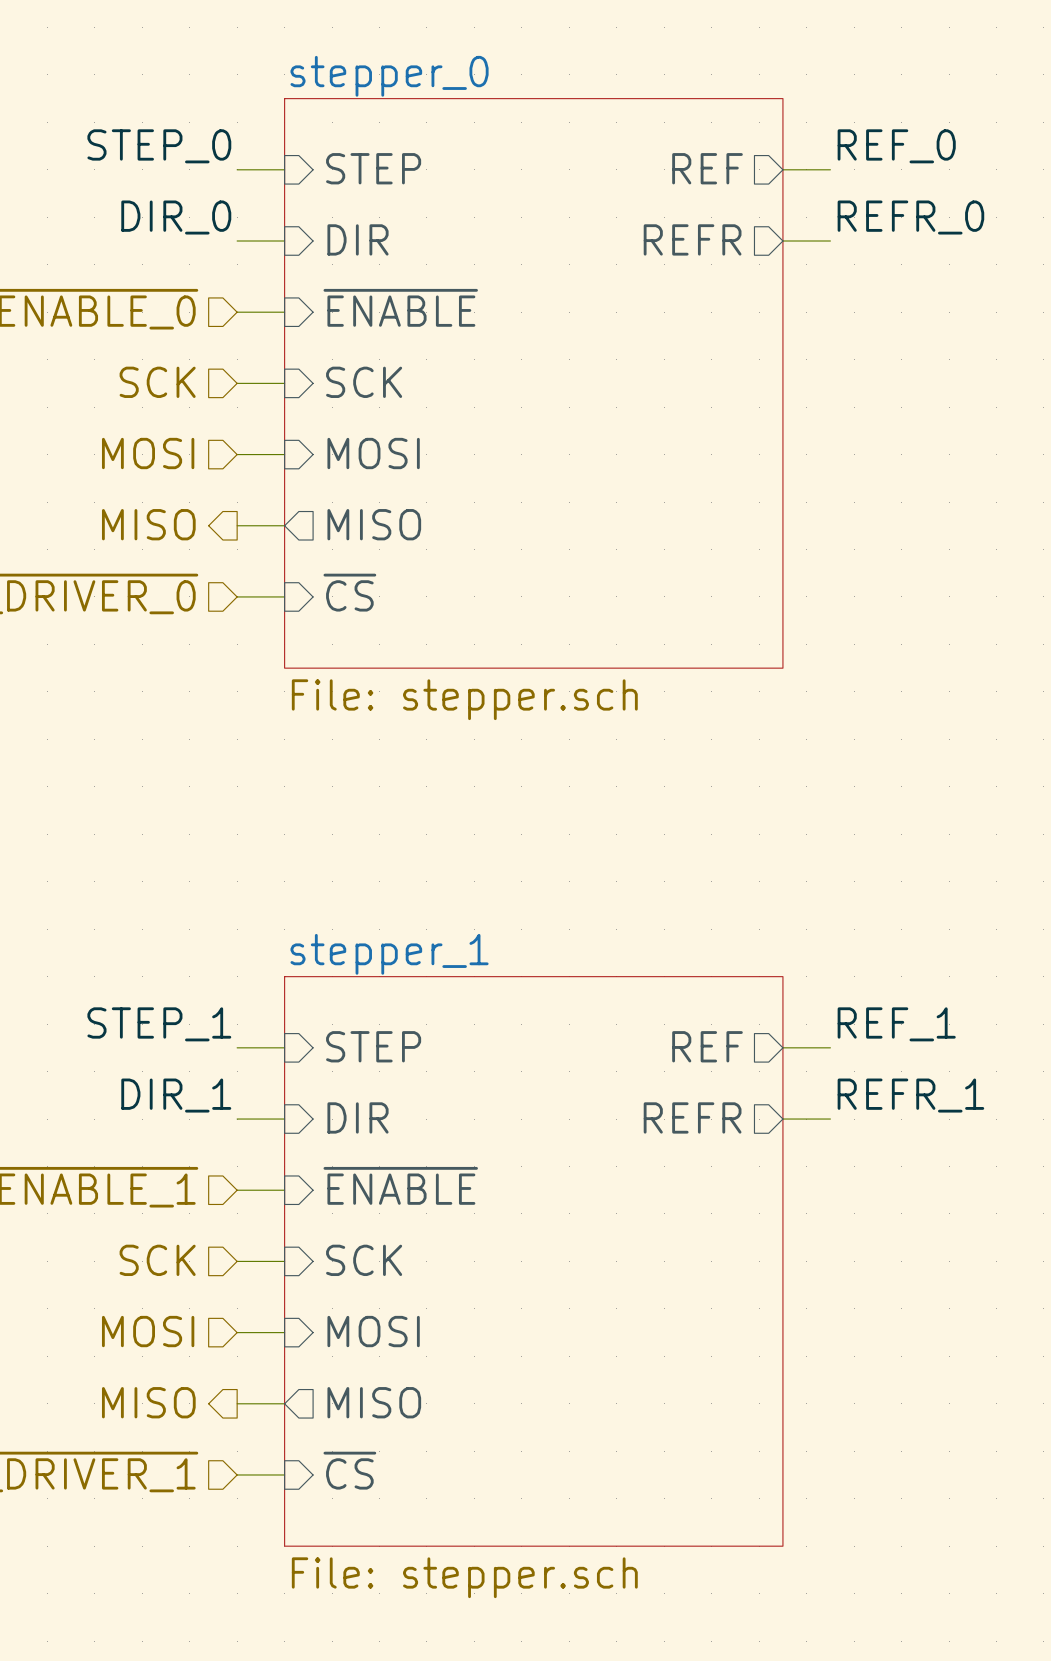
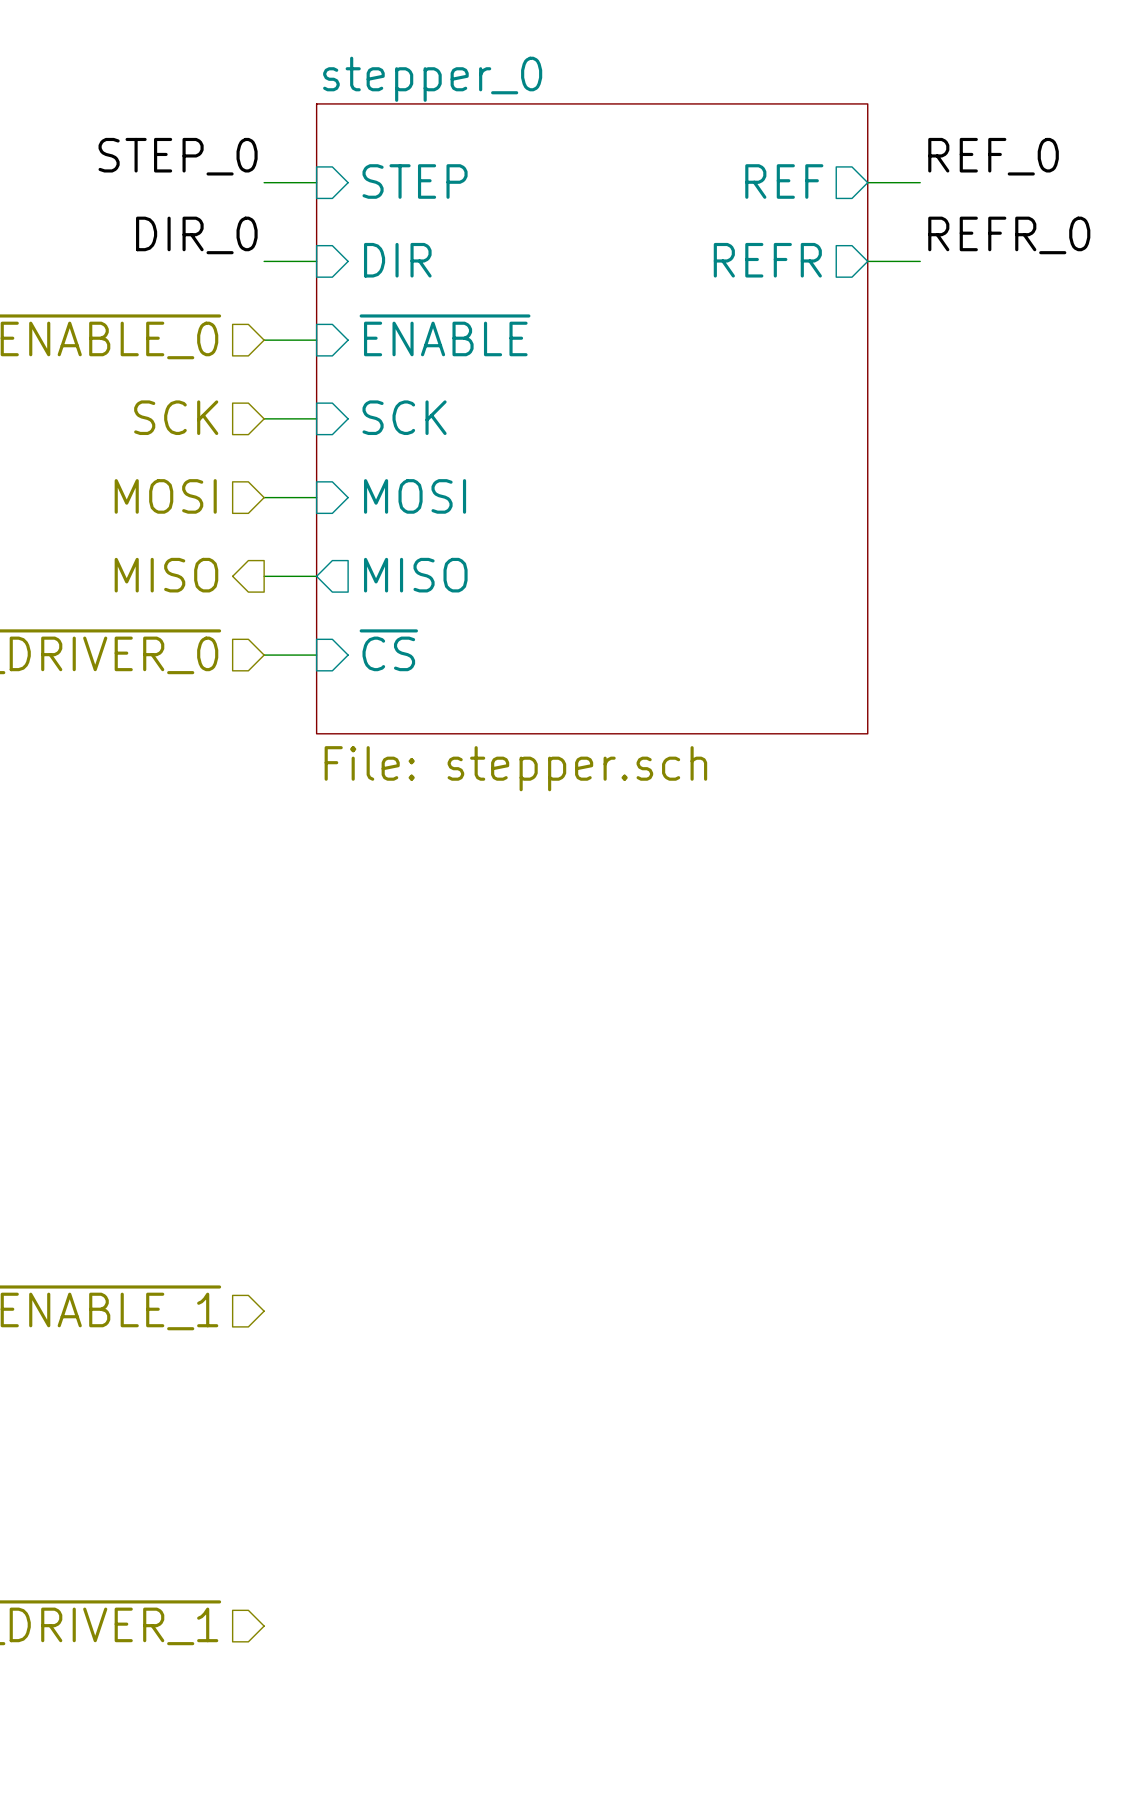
label: STEP_1 (159, 1024) -> none
label: REF_1 (896, 1024) -> none
sheet pin: STEP (373, 1046) -> none
sheet pin: REF (707, 1046) -> none
wire: (237, 1047) (284, 1047) -> none
wire: (782, 1047) (830, 1047) -> none
label: DIR_1 (176, 1095) -> none
label: REFR_1 (910, 1095) -> none
sheet pin: DIR (358, 1117) -> none
sheet pin: REFR (692, 1117) -> none
wire: (237, 1119) (284, 1119) -> none
wire: (782, 1119) (830, 1119) -> none
sheet pin: ~{ENABLE} (400, 1185) -> none
wire: (237, 1190) (284, 1190) -> none
hierarchical label: SCK (157, 1260) -> none
sheet pin: SCK (364, 1260) -> none
wire: (237, 1261) (284, 1261) -> none
sheet stepper_1: File: stepper.sch (533, 1261) -> none
hierarchical label: MOSI (148, 1331) -> none
sheet pin: MOSI (373, 1331) -> none
wire: (237, 1332) (284, 1332) -> none
hierarchical label: MISO (148, 1402) -> none
sheet pin: MISO (374, 1402) -> none
wire: (237, 1403) (284, 1403) -> none
sheet pin: ~{CS} (349, 1470) -> none
wire: (237, 1474) (284, 1474) -> none

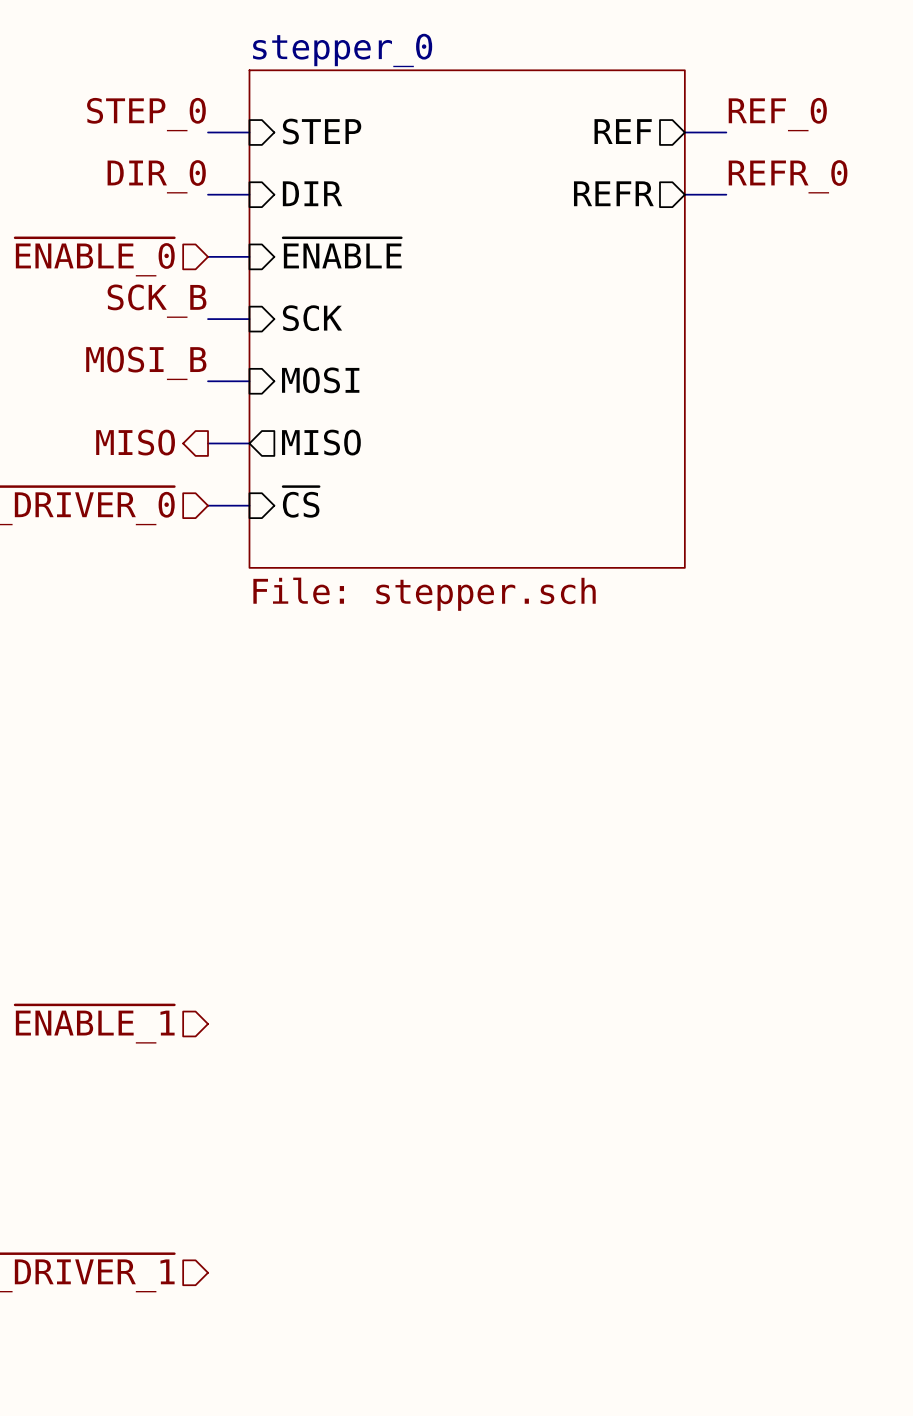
label: none -> SCK_B (157, 301)
hierarchical label: SCK (176, 417) -> none
label: none -> MOSI_B (146, 363)
hierarchical label: MOSI (165, 496) -> none

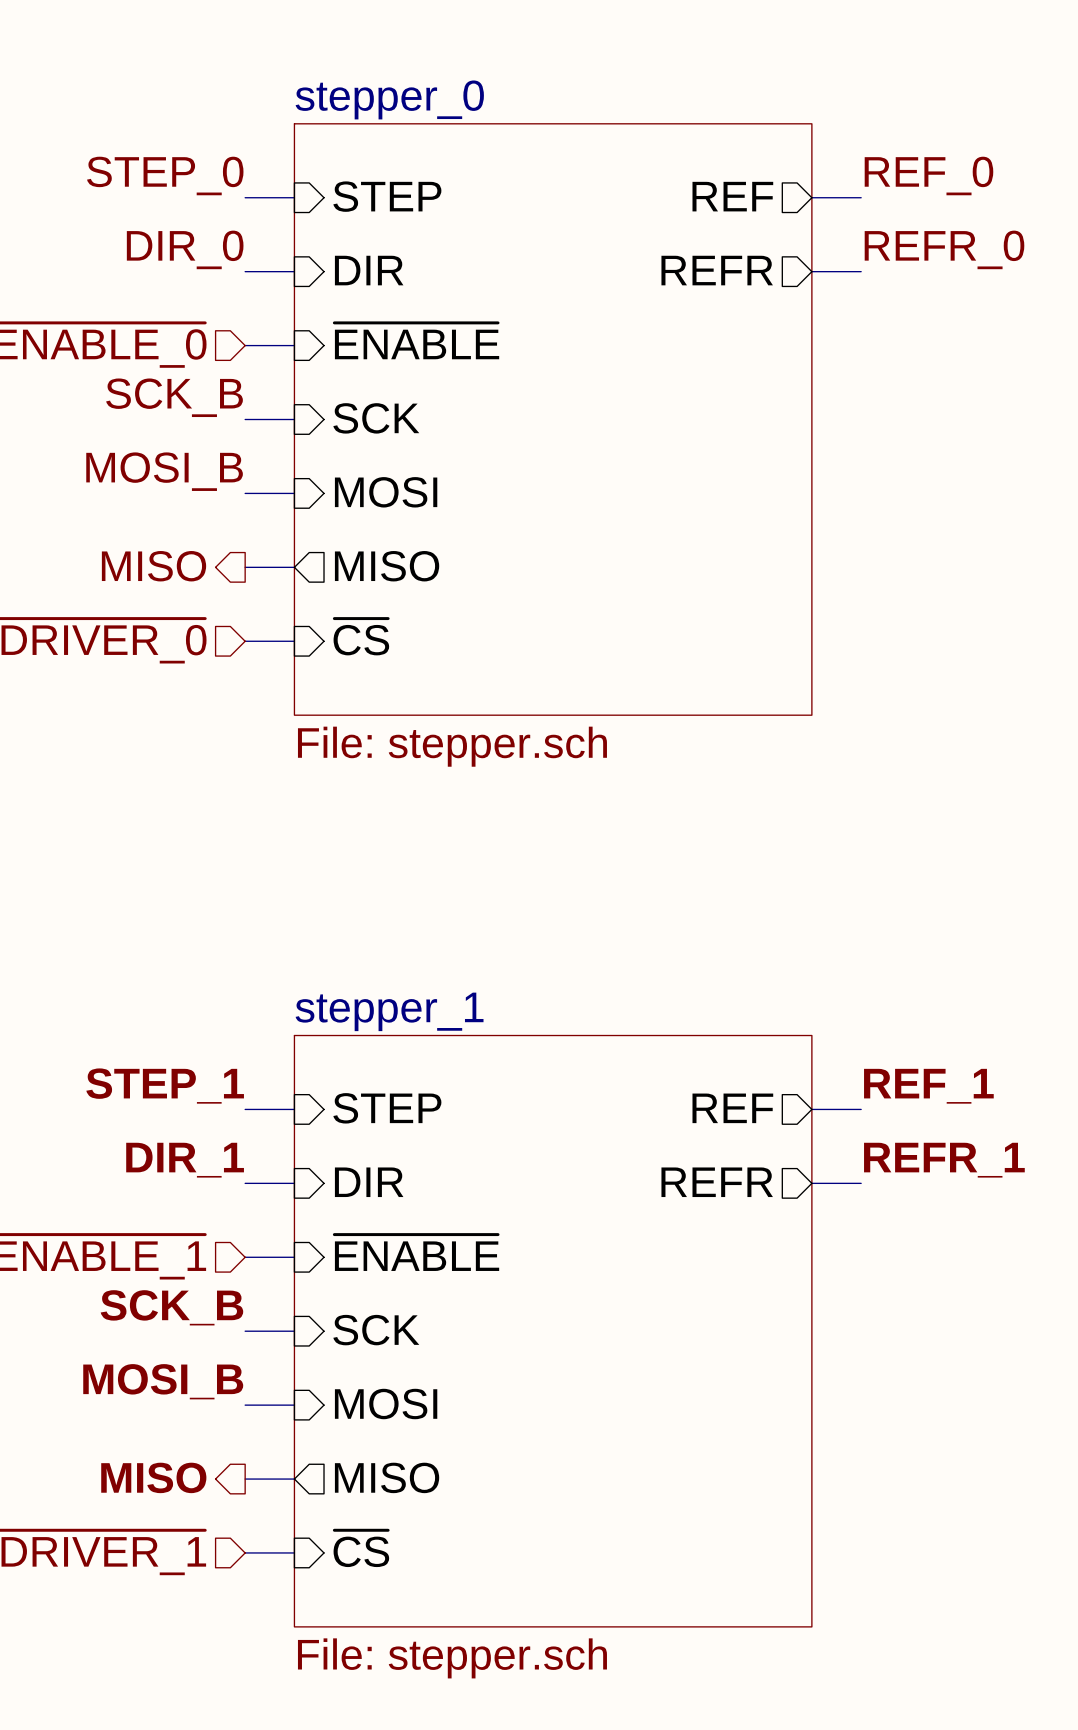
label: none -> STEP_1 (165, 1086)
label: none -> REF_1 (928, 1086)
sheet pin: none -> STEP (387, 1108)
sheet pin: none -> REF (732, 1108)
wire: none -> (245, 1109) (294, 1109)
wire: none -> (811, 1109) (861, 1109)
label: none -> DIR_1 (185, 1160)
label: none -> REFR_1 (944, 1160)
sheet pin: none -> DIR (369, 1182)
sheet pin: none -> REFR (717, 1182)
wire: none -> (245, 1183) (294, 1183)
wire: none -> (811, 1183) (861, 1183)
sheet pin: none -> ~{ENABLE} (416, 1252)
wire: none -> (245, 1257) (294, 1257)
label: none -> SCK_B (171, 1307)
sheet pin: none -> SCK (376, 1330)
wire: none -> (245, 1331) (294, 1331)
sheet stepper_1: none -> File: stepper.sch (553, 1331)
label: none -> MOSI_B (163, 1381)
sheet pin: none -> MOSI (386, 1404)
wire: none -> (245, 1405) (294, 1405)
hierarchical label: none -> MISO (153, 1477)
sheet pin: none -> MISO (387, 1477)
wire: none -> (245, 1479) (294, 1479)
sheet pin: none -> ~{CS} (361, 1548)
wire: none -> (245, 1552) (294, 1552)

